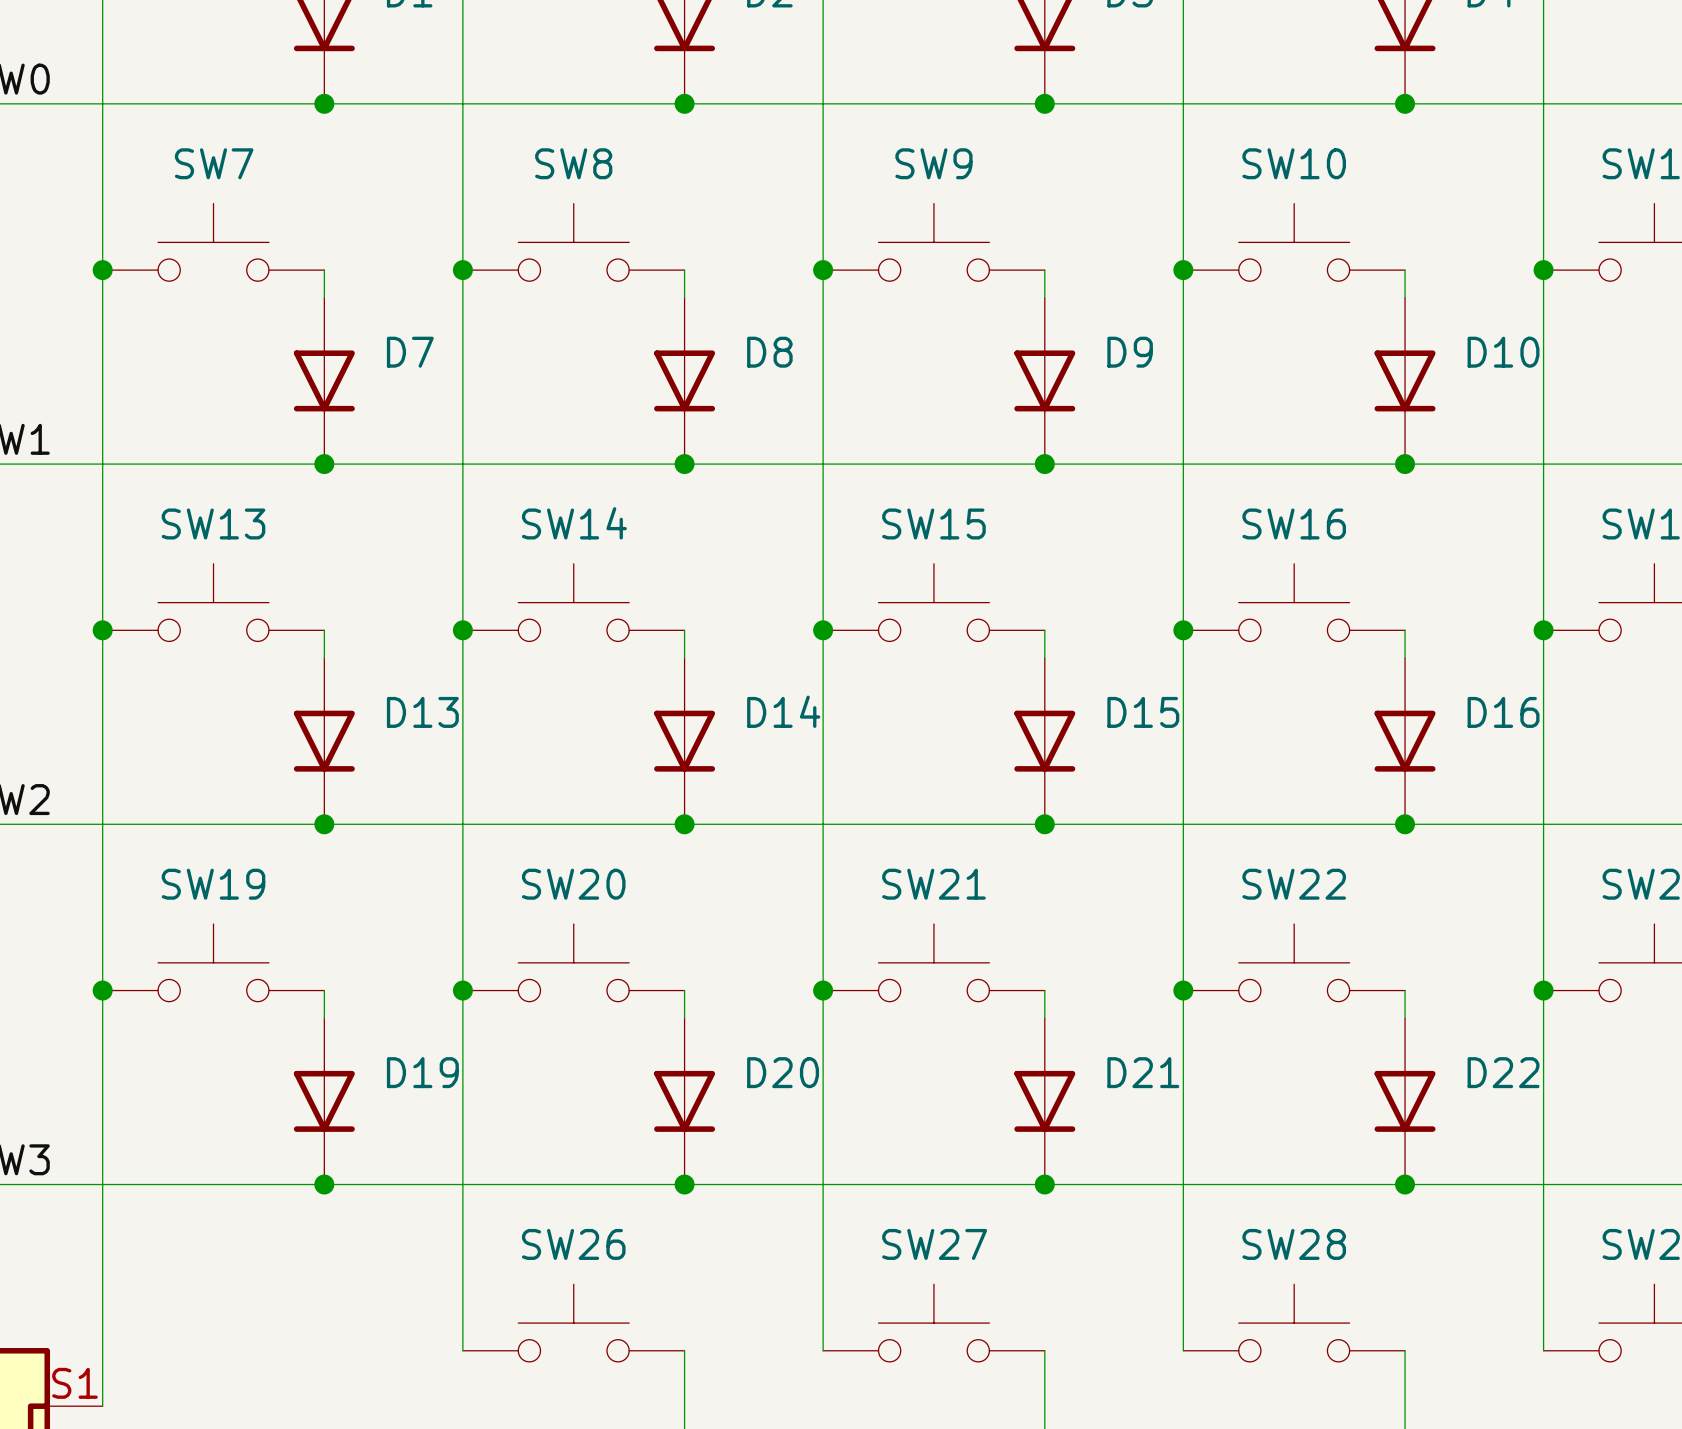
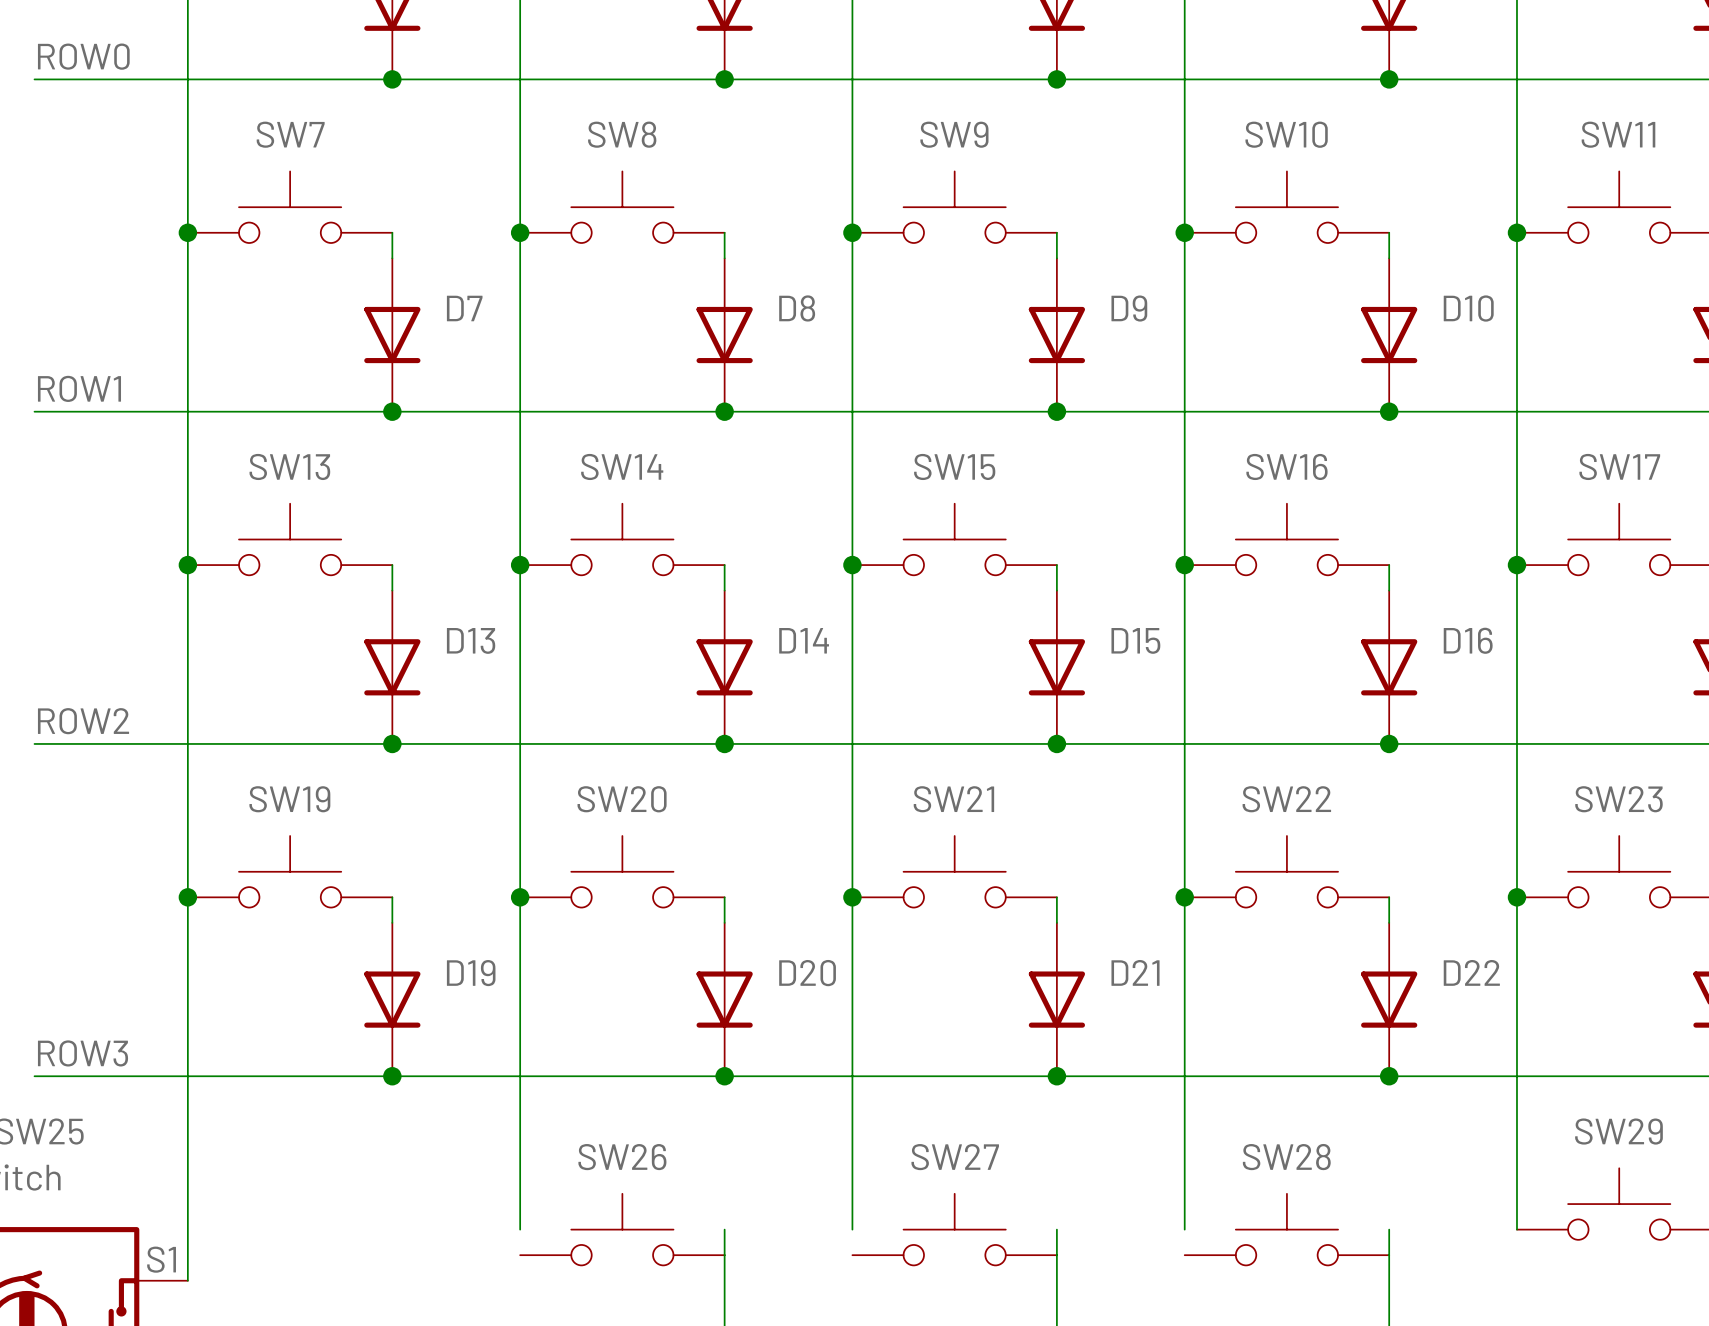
SW26 position: (573, 1323) -> (622, 1229)
SW27 position: (933, 1323) -> (954, 1229)
SW28 position: (1294, 1323) -> (1286, 1229)

